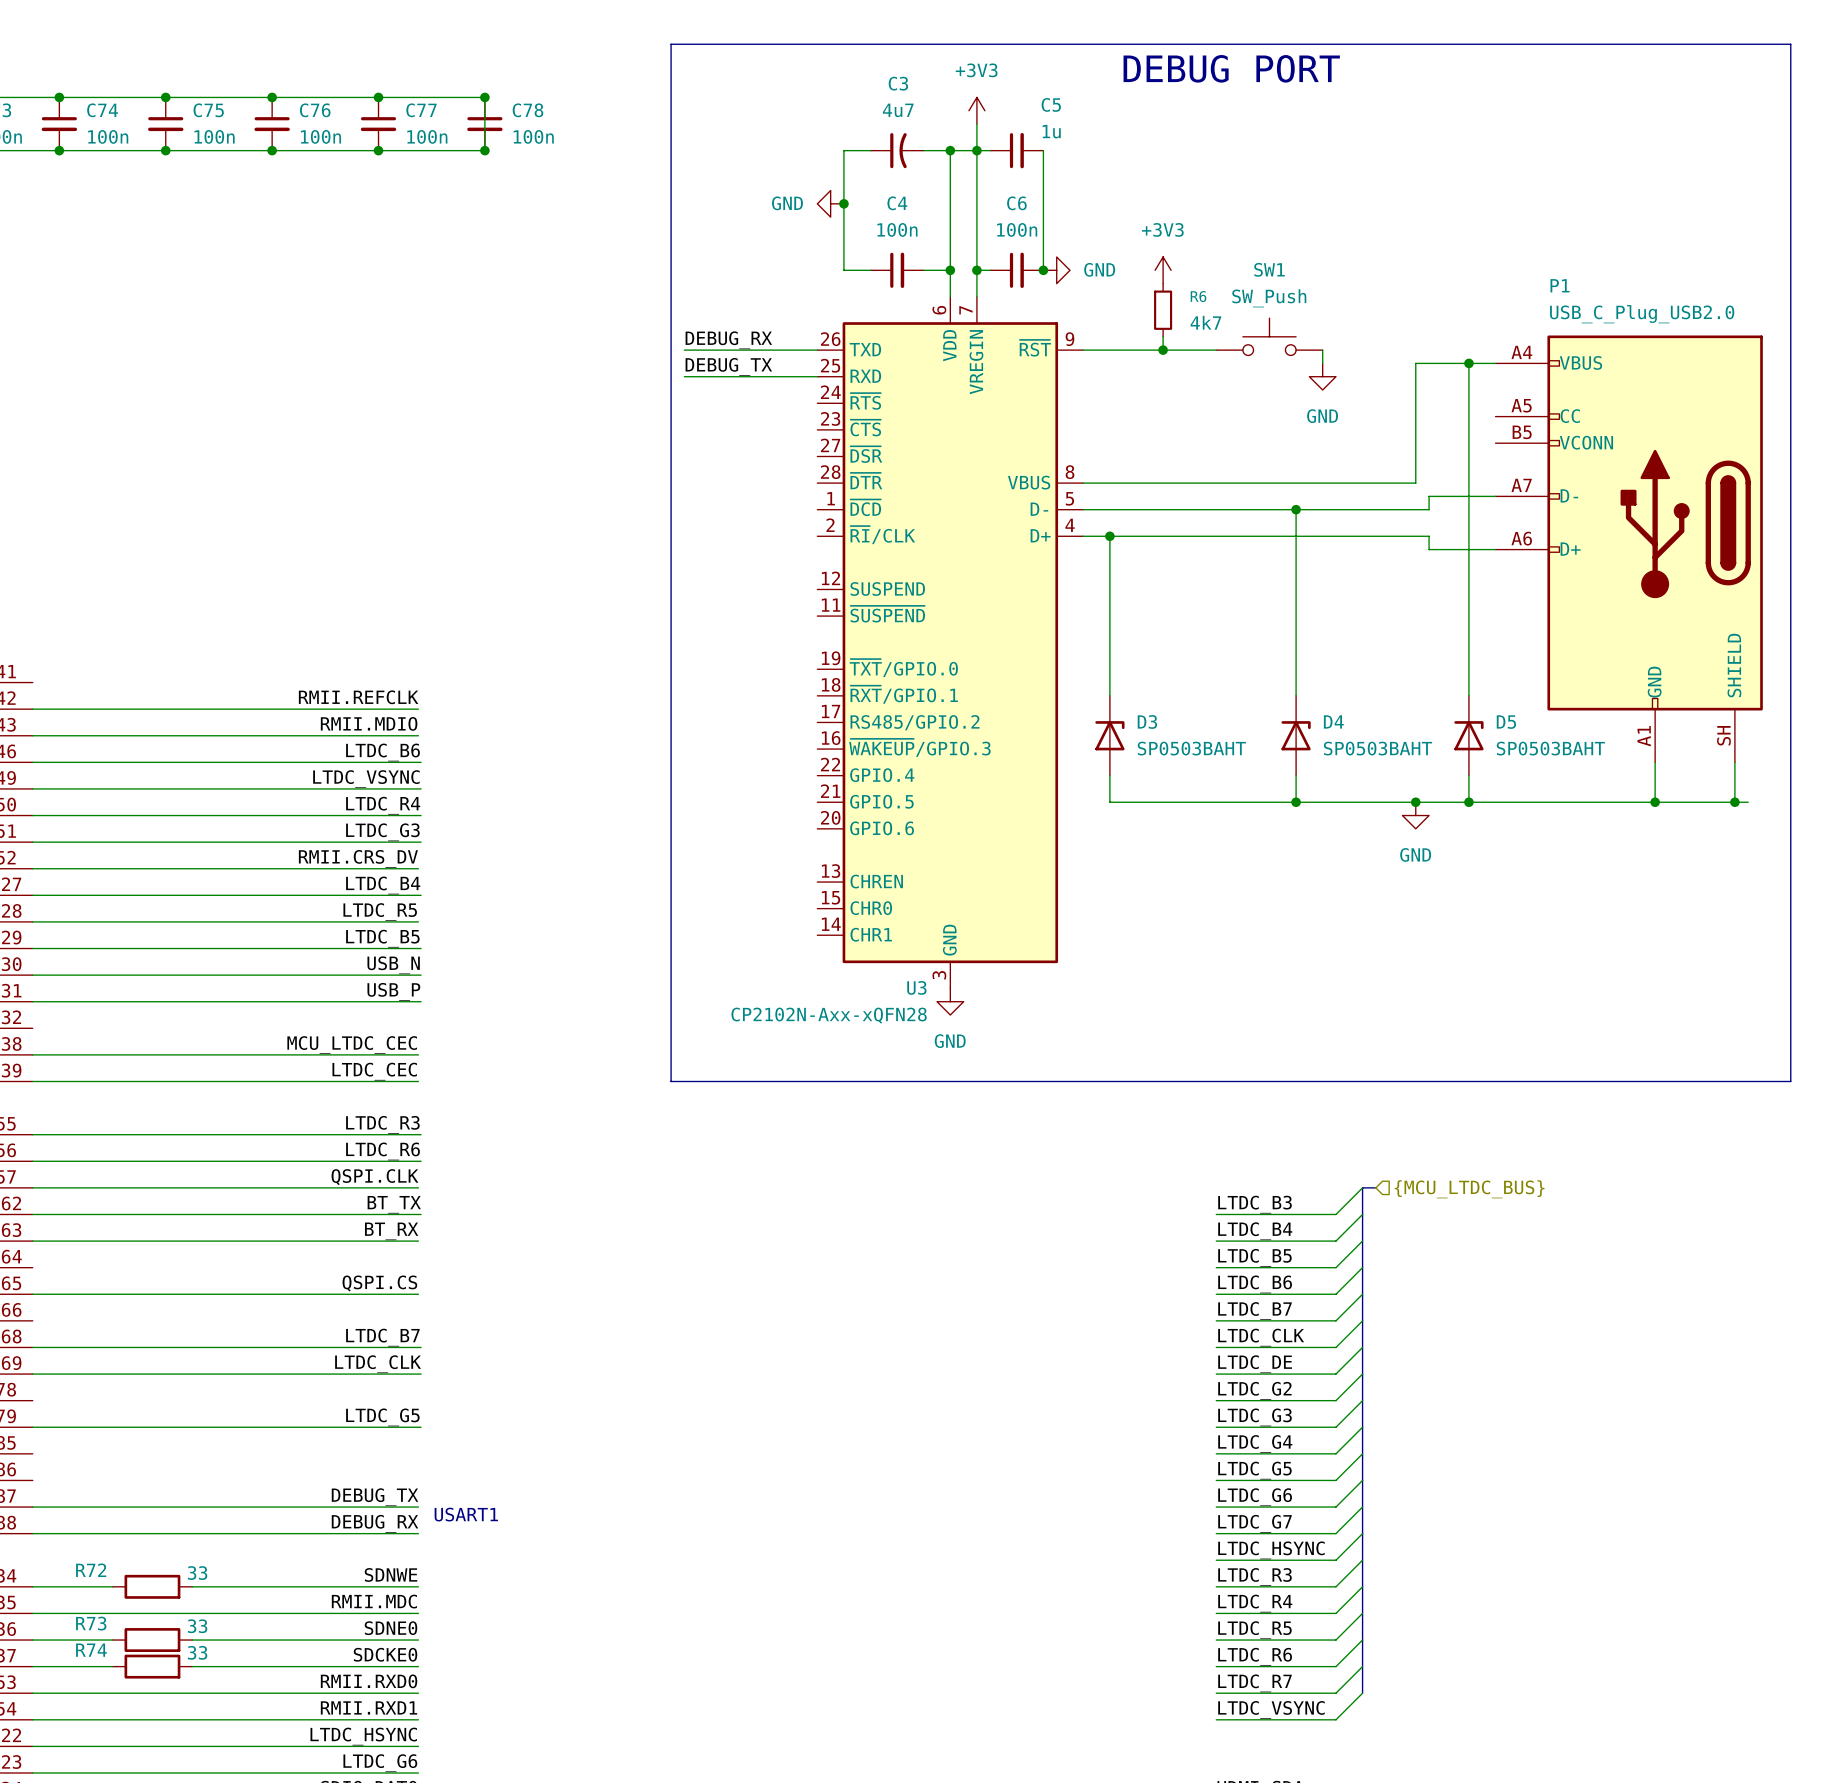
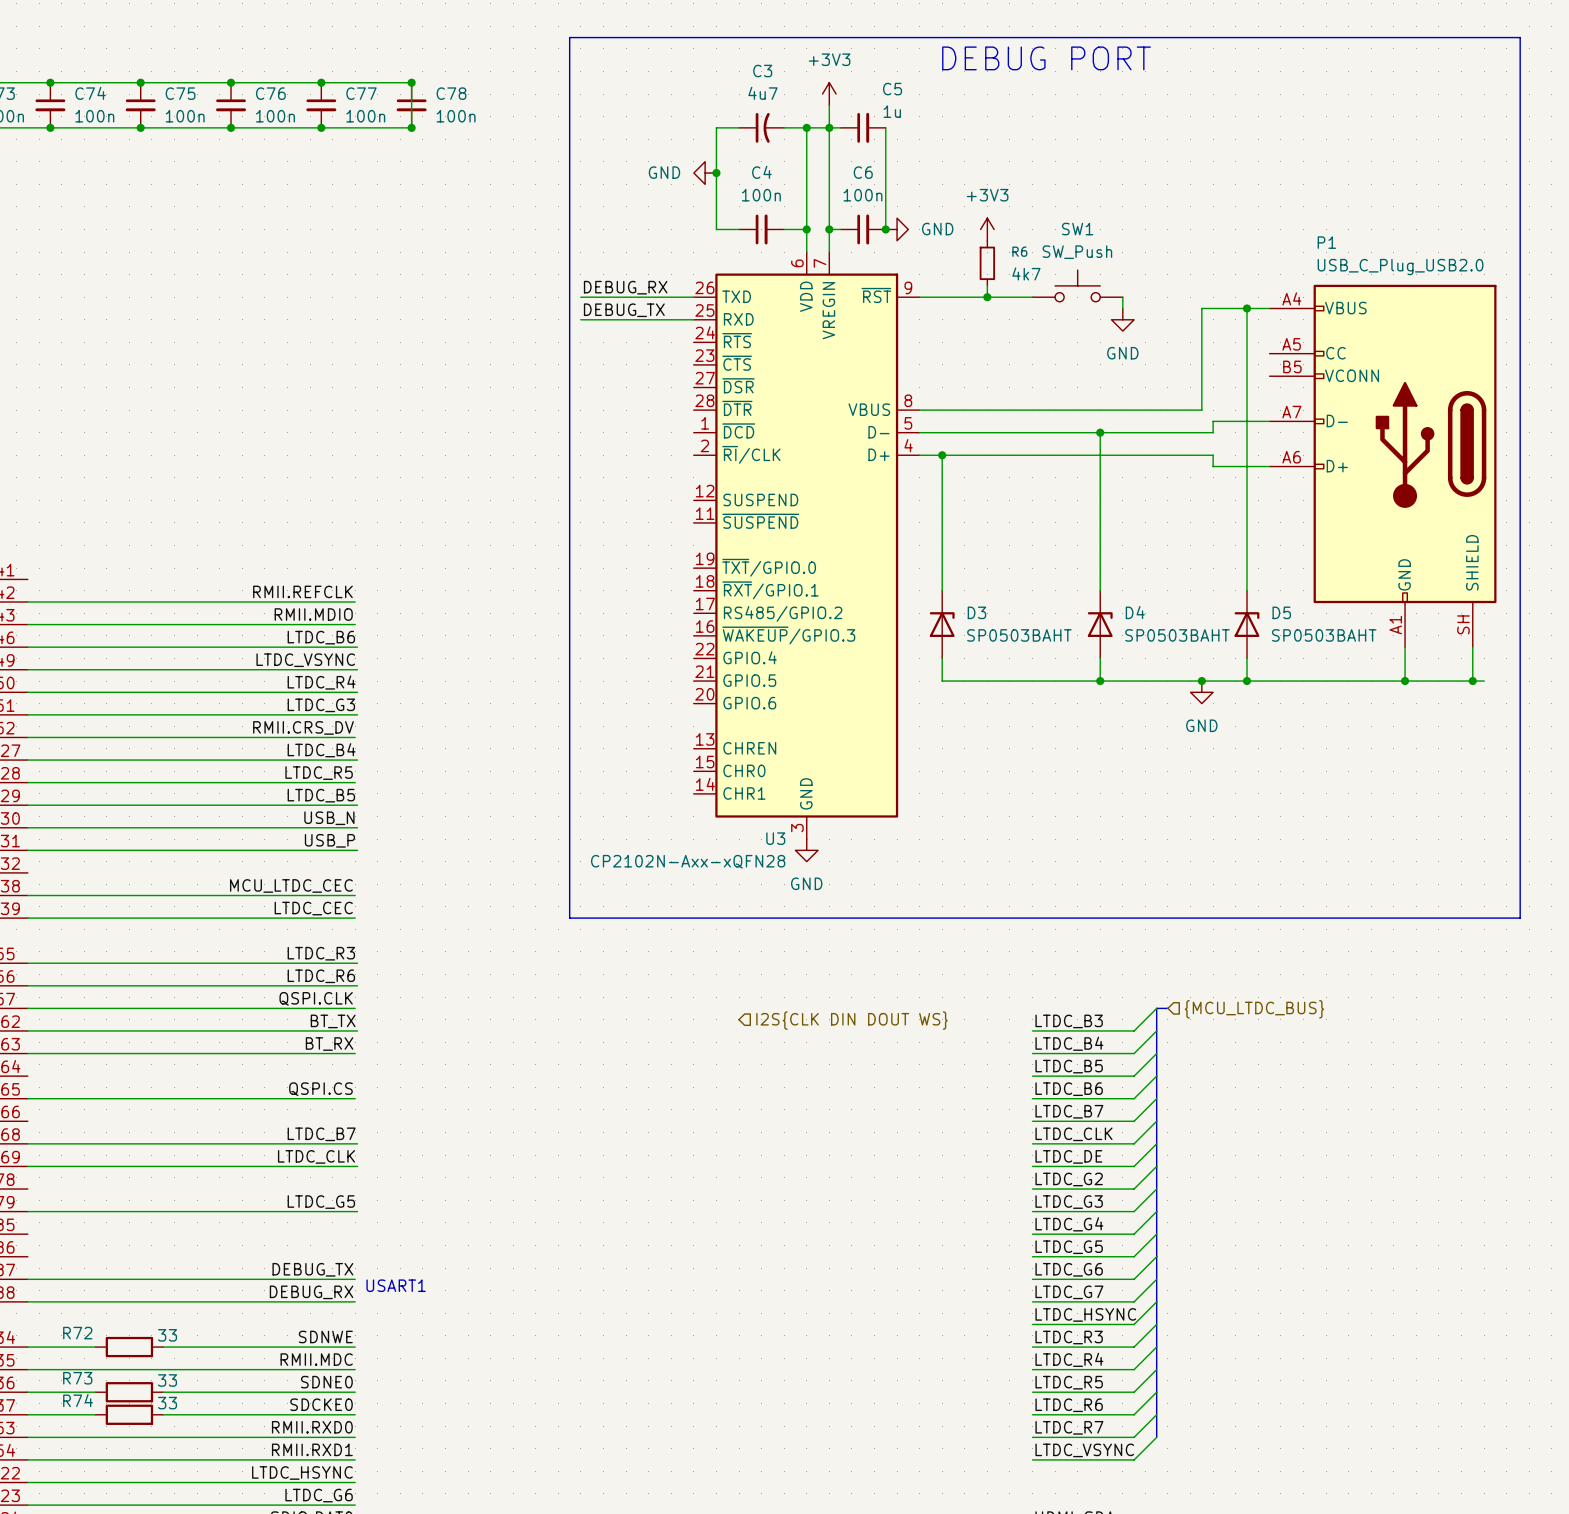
hierarchical label: none -> I2S{CLK DIN DOUT WS} (852, 1020)

